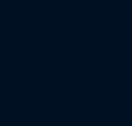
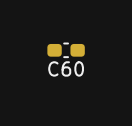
C60: none -> (66, 50)

